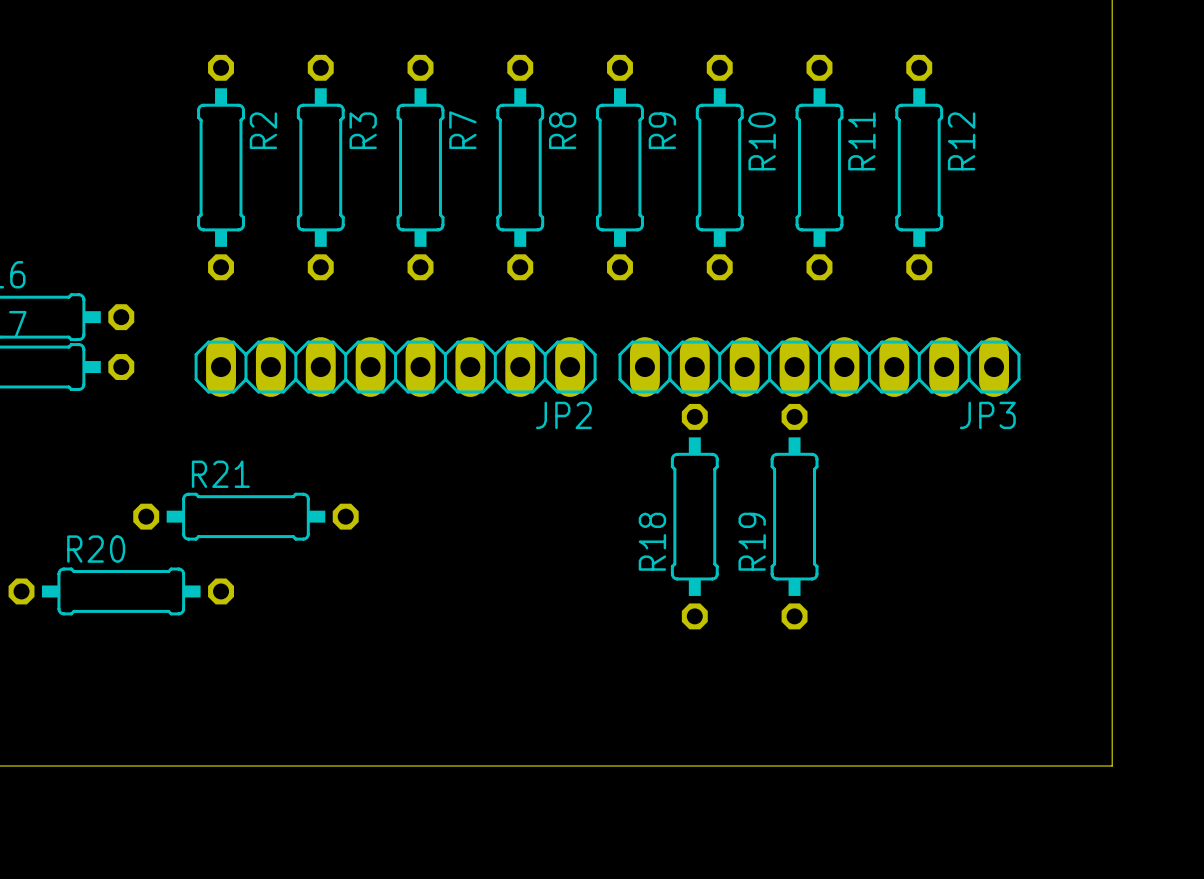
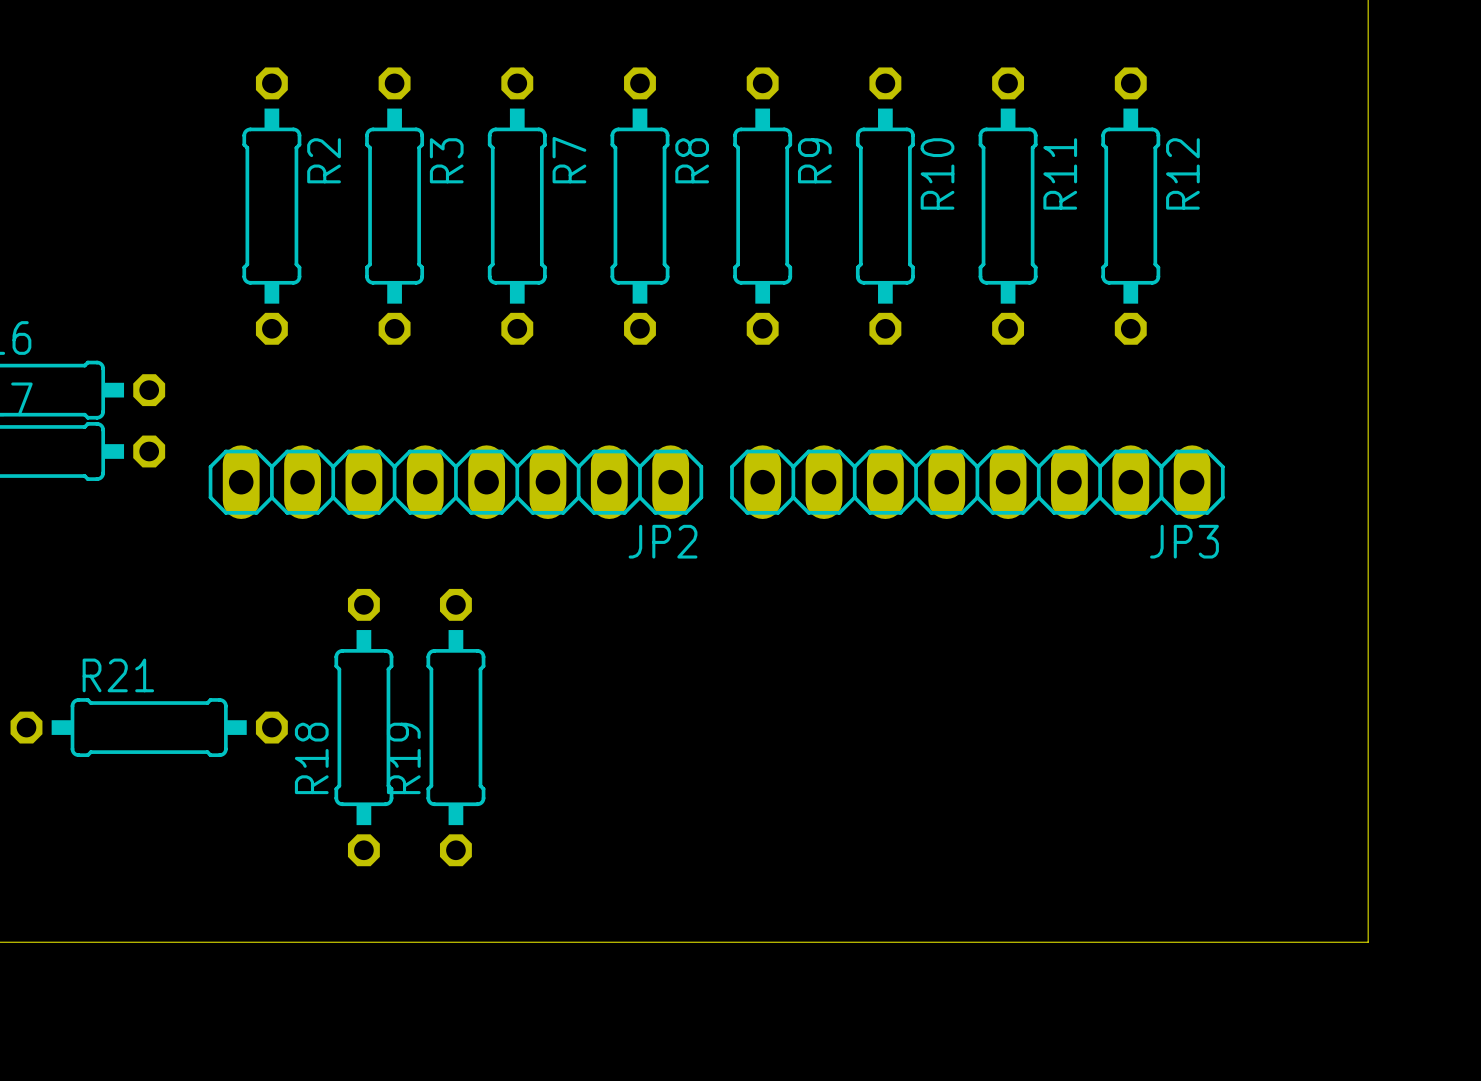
JP2 position: (395, 367) -> (455, 482)
JP3 position: (819, 367) -> (977, 482)
R21: (245, 516) -> none
R18 position: (694, 516) -> (363, 727)
R19 position: (794, 516) -> (455, 727)
R20 name: R20 (96, 549) -> R21 (118, 675)

